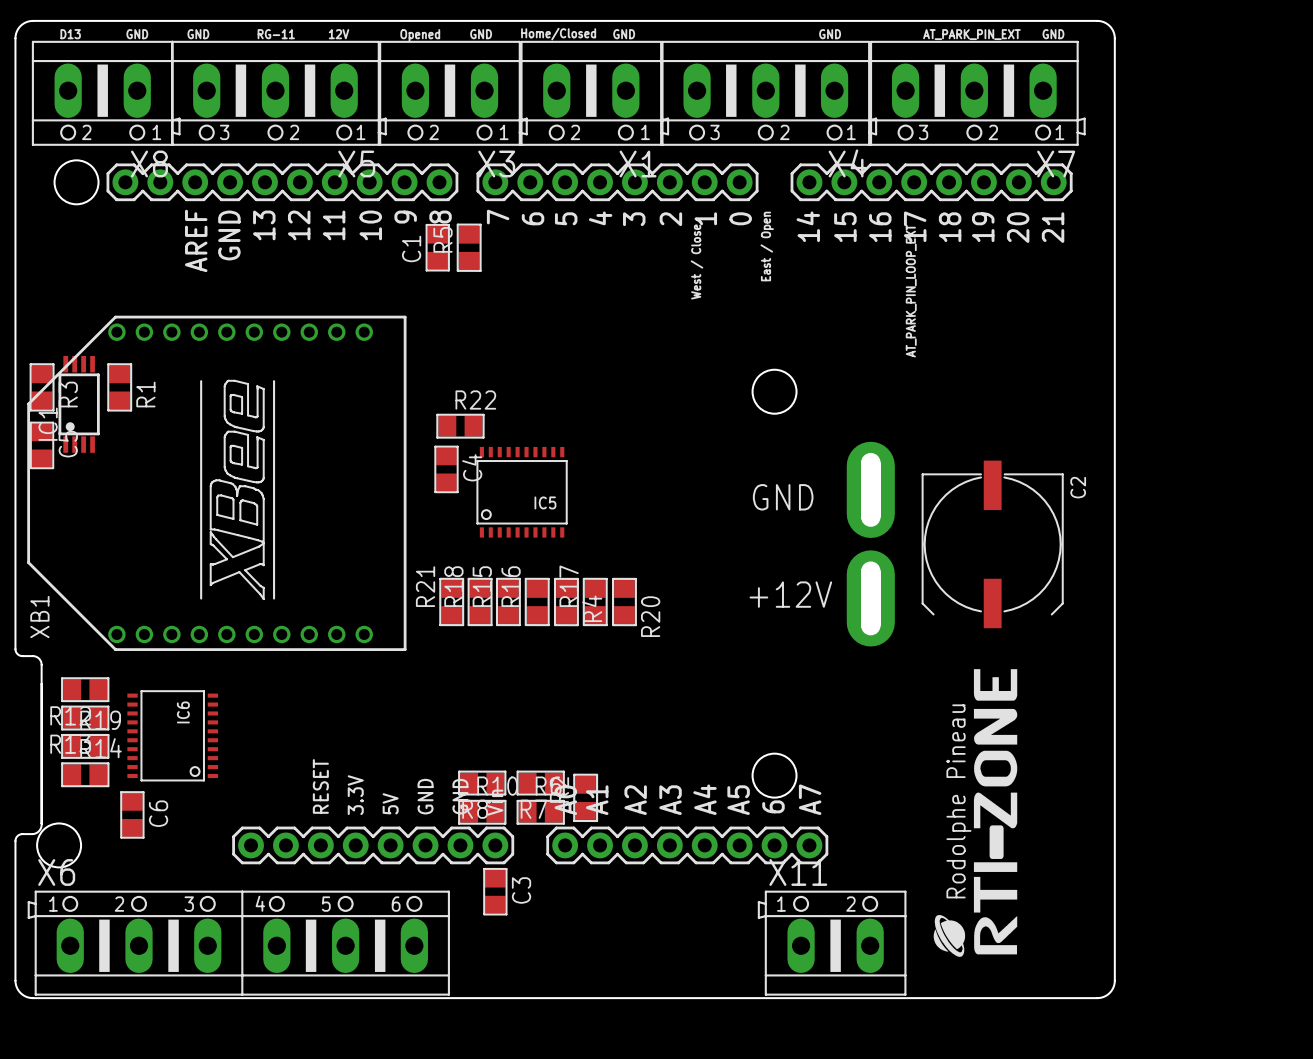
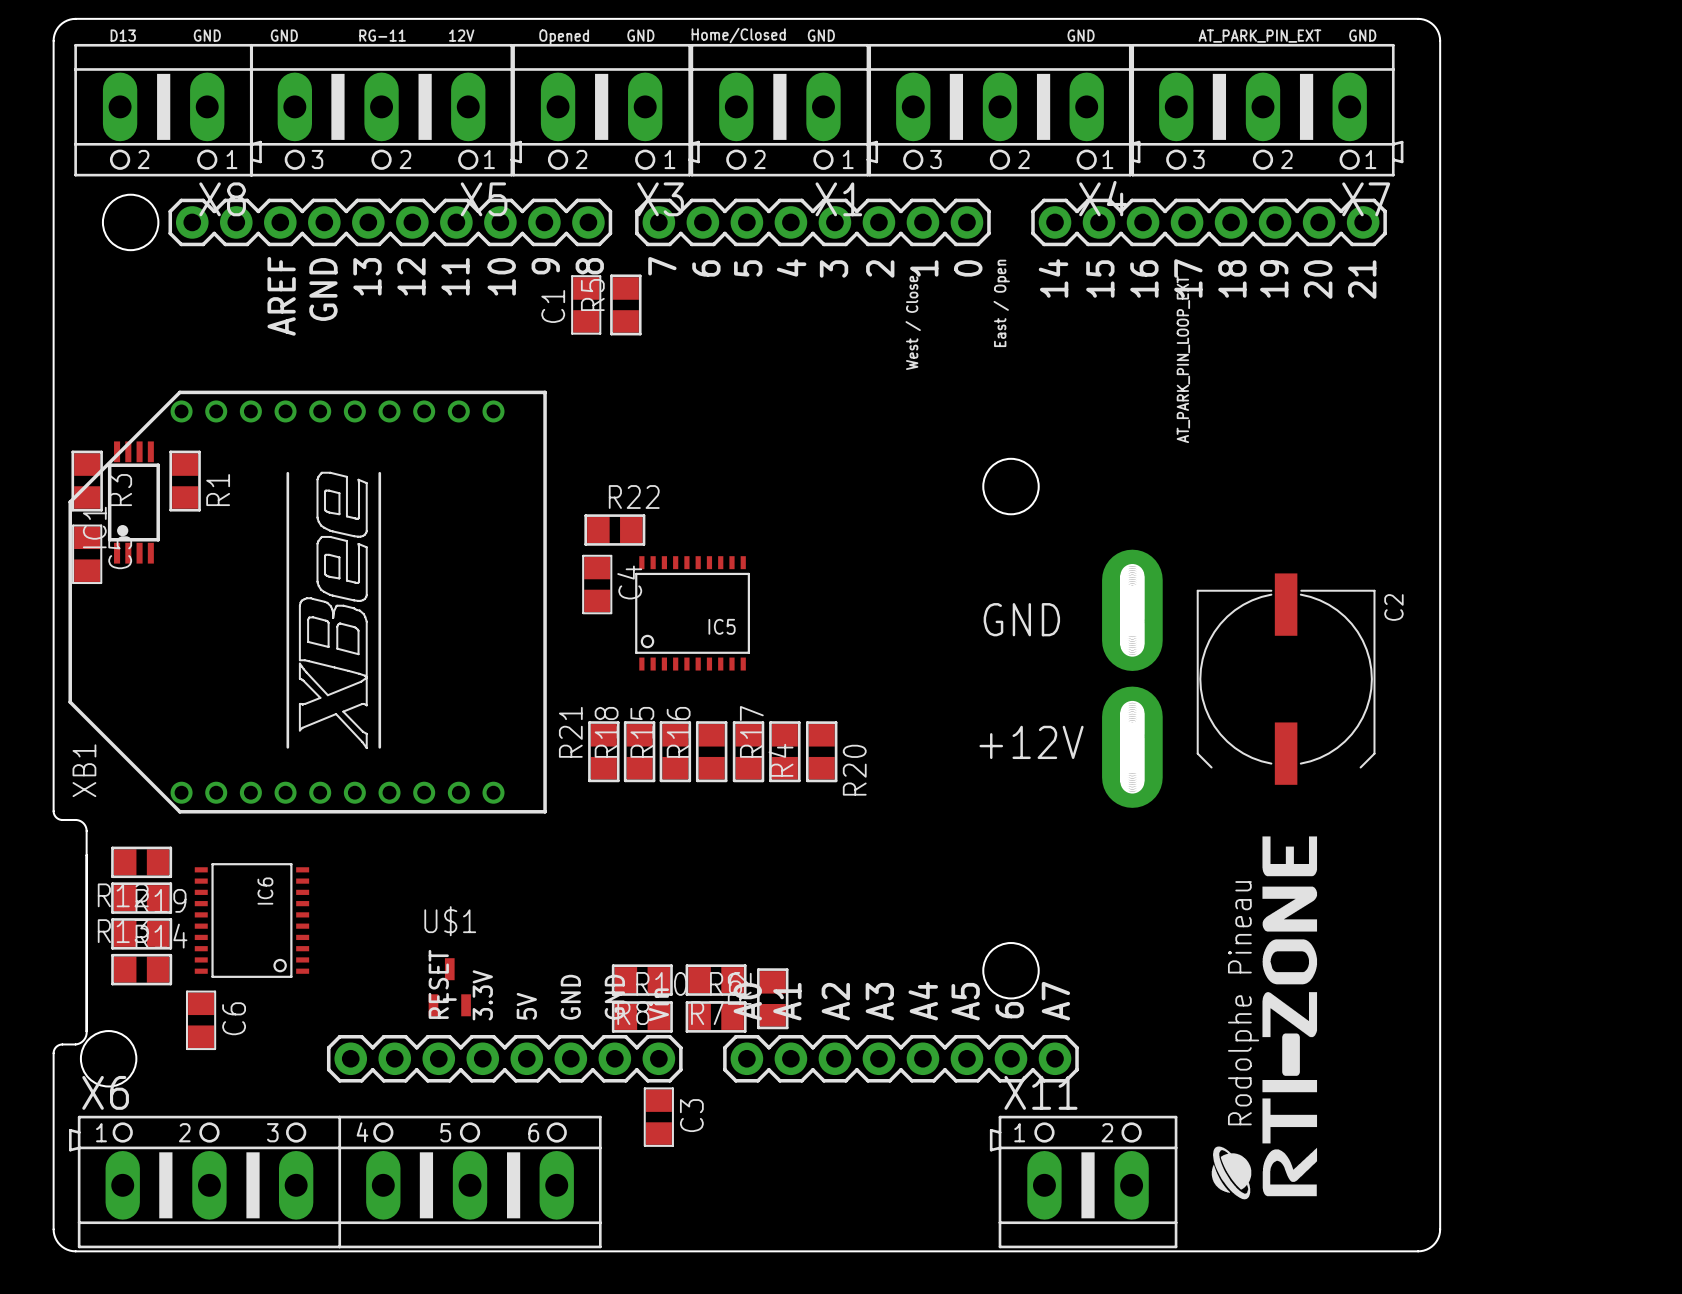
U$1: none -> (449, 987)

